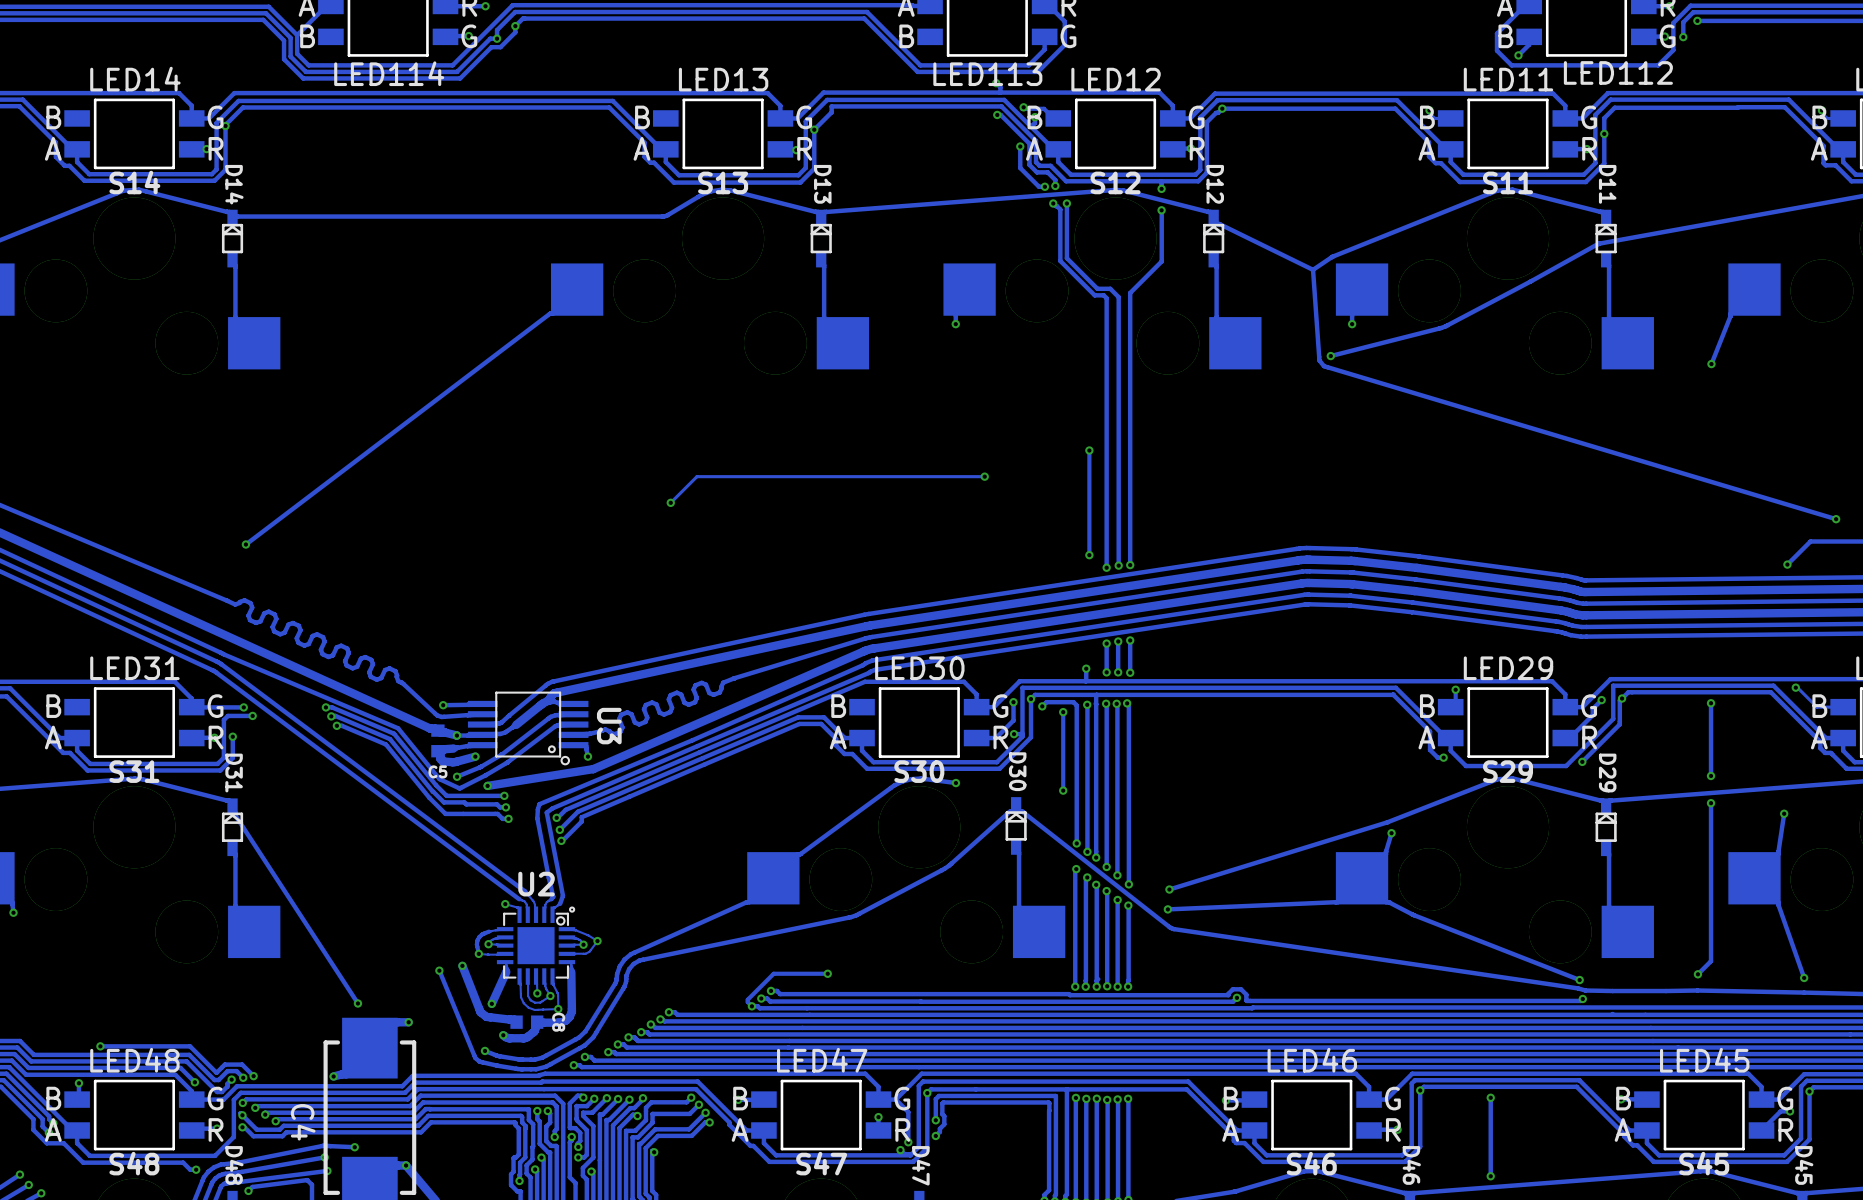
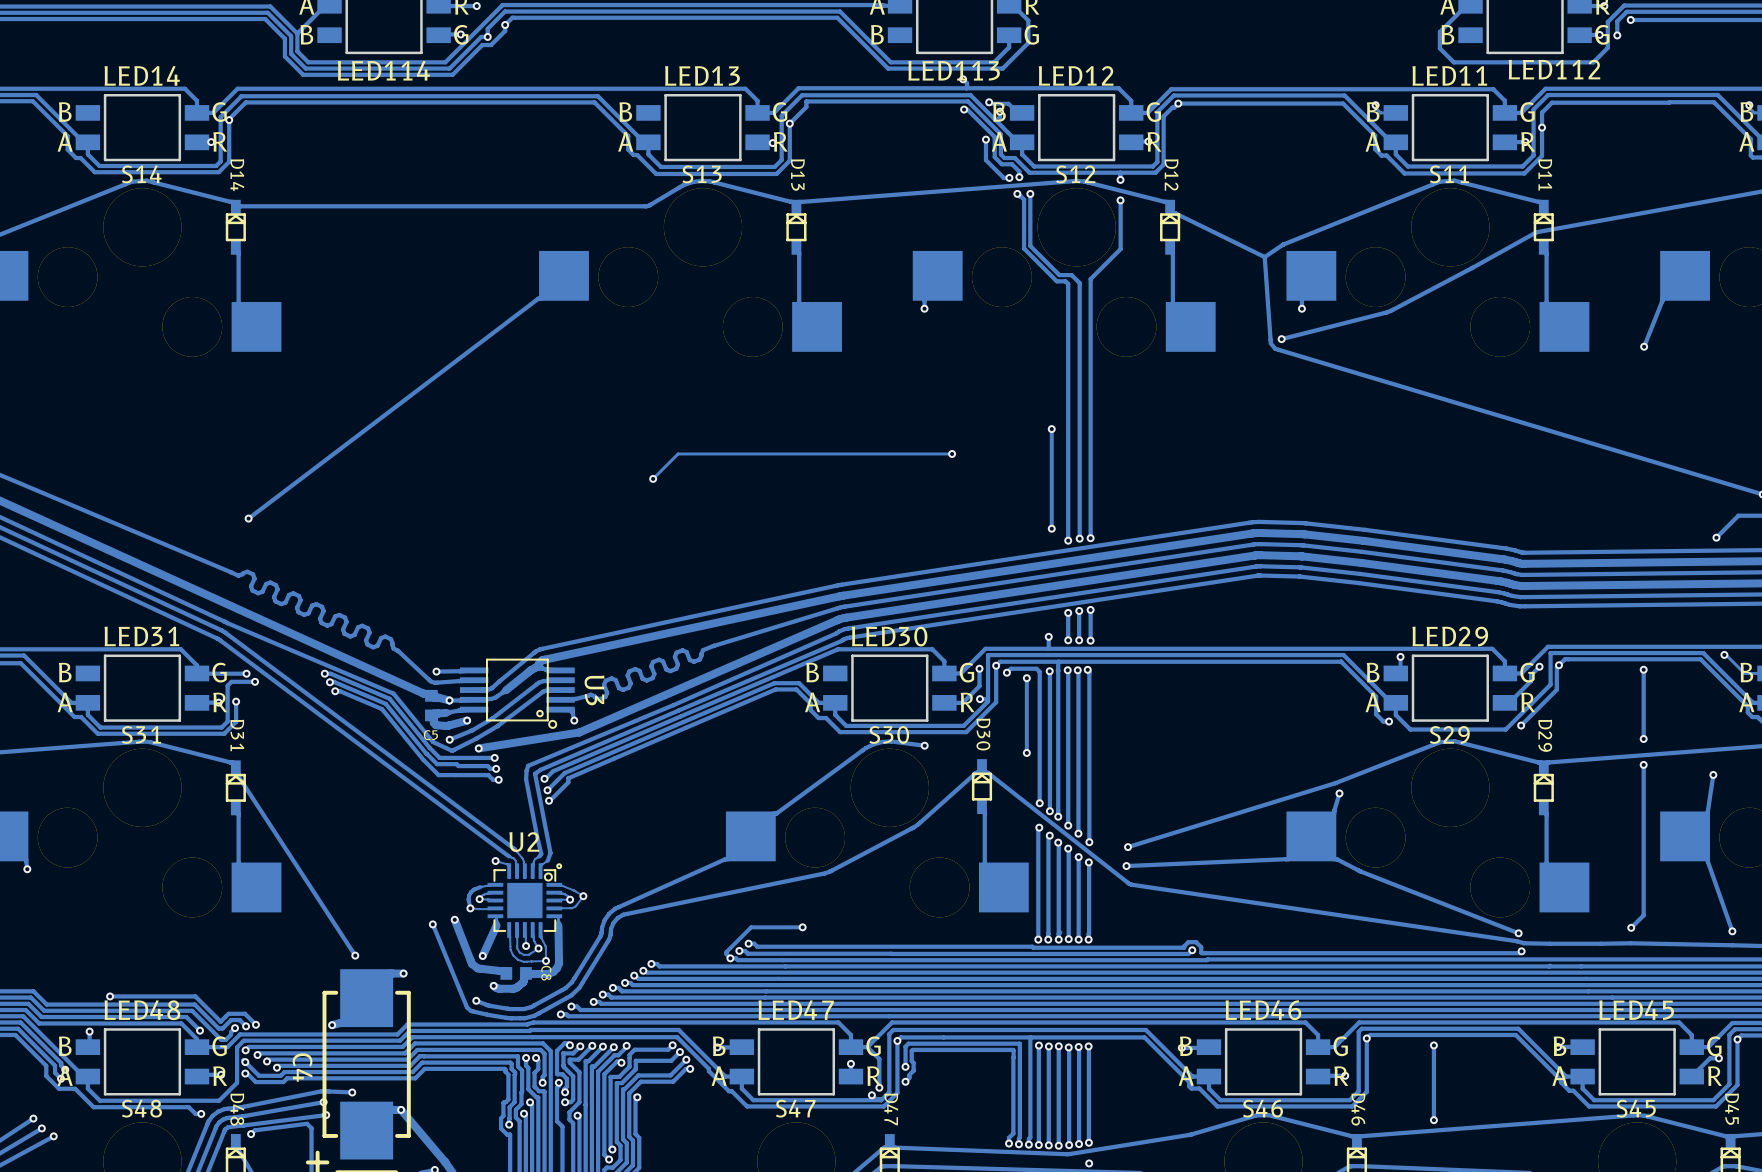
track: (1529, 36) (1529, 44) (1518, 55) -> none
via: (1518, 55) -> none

